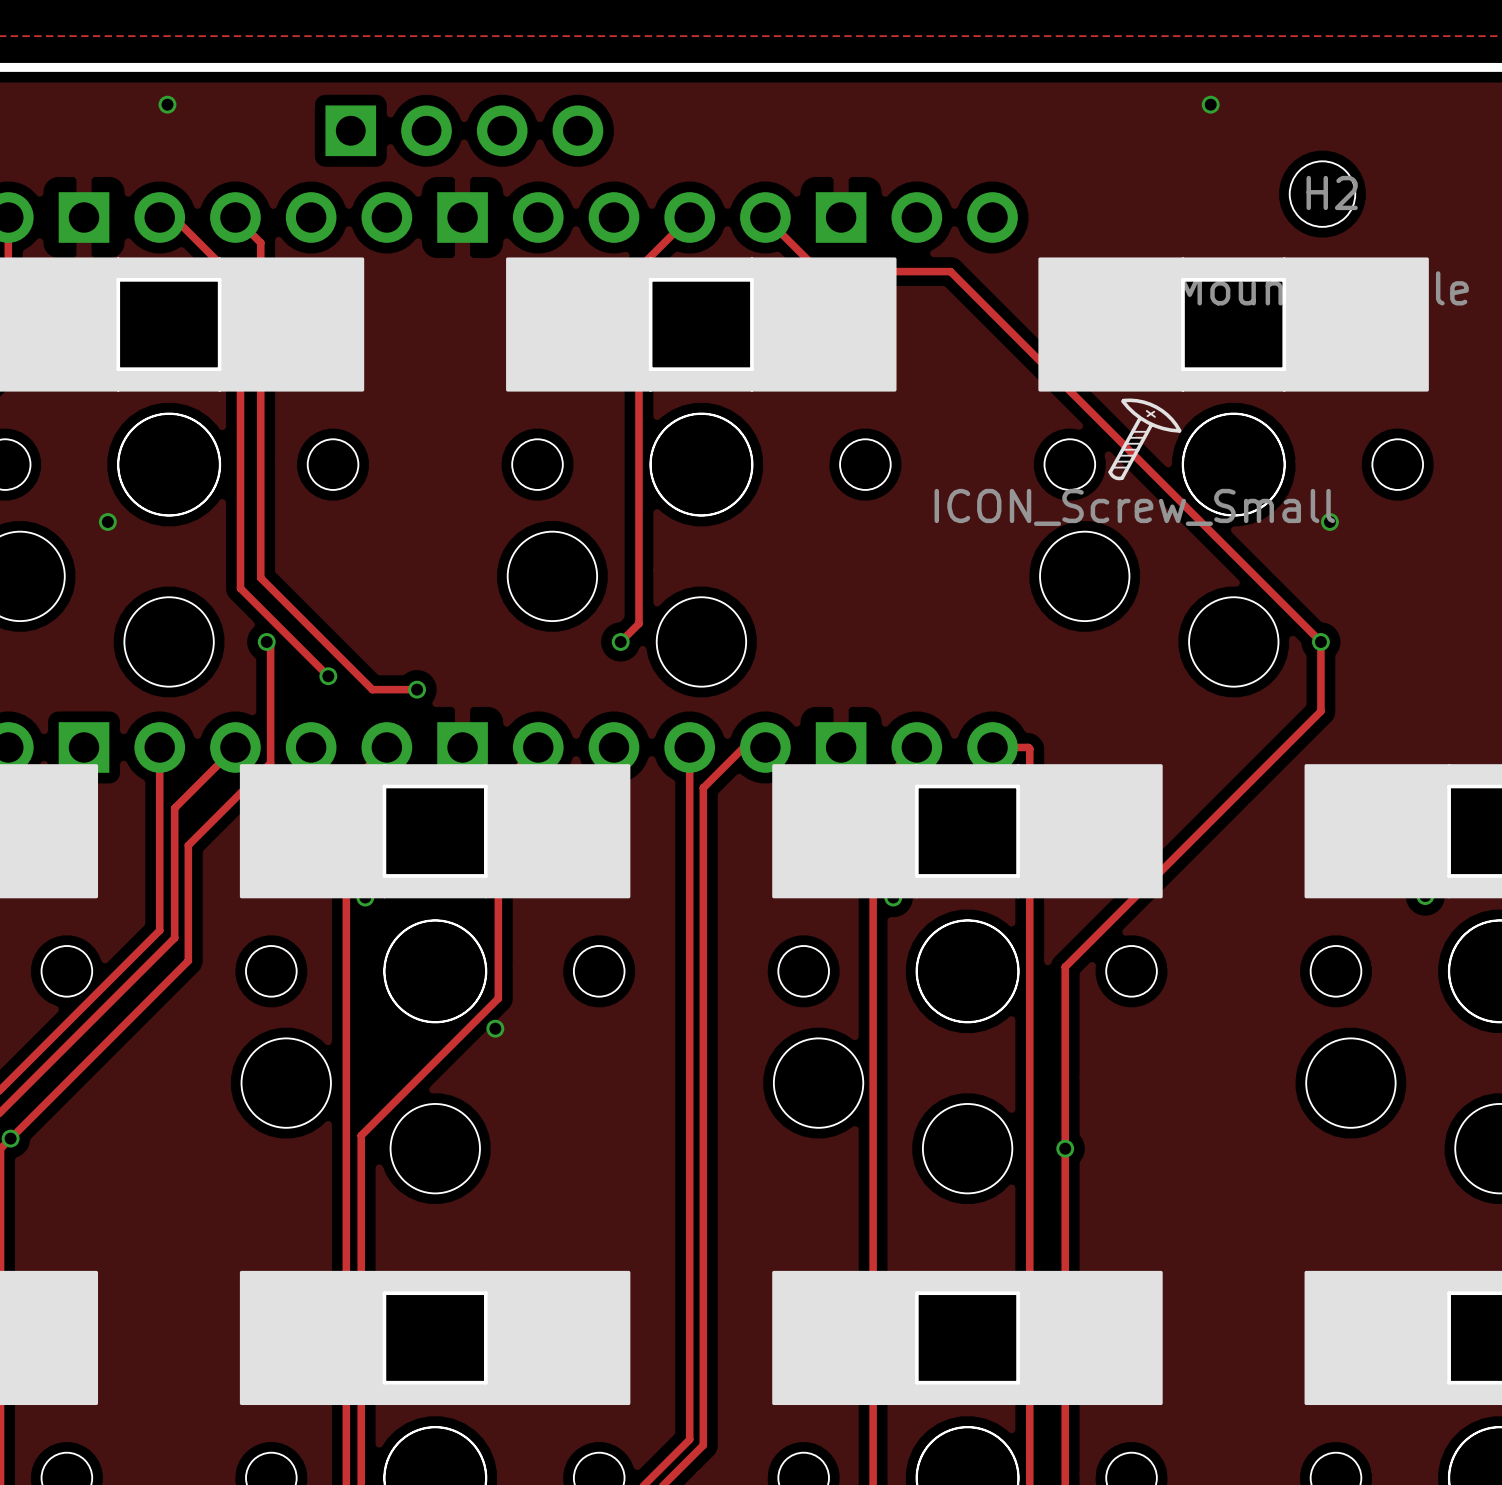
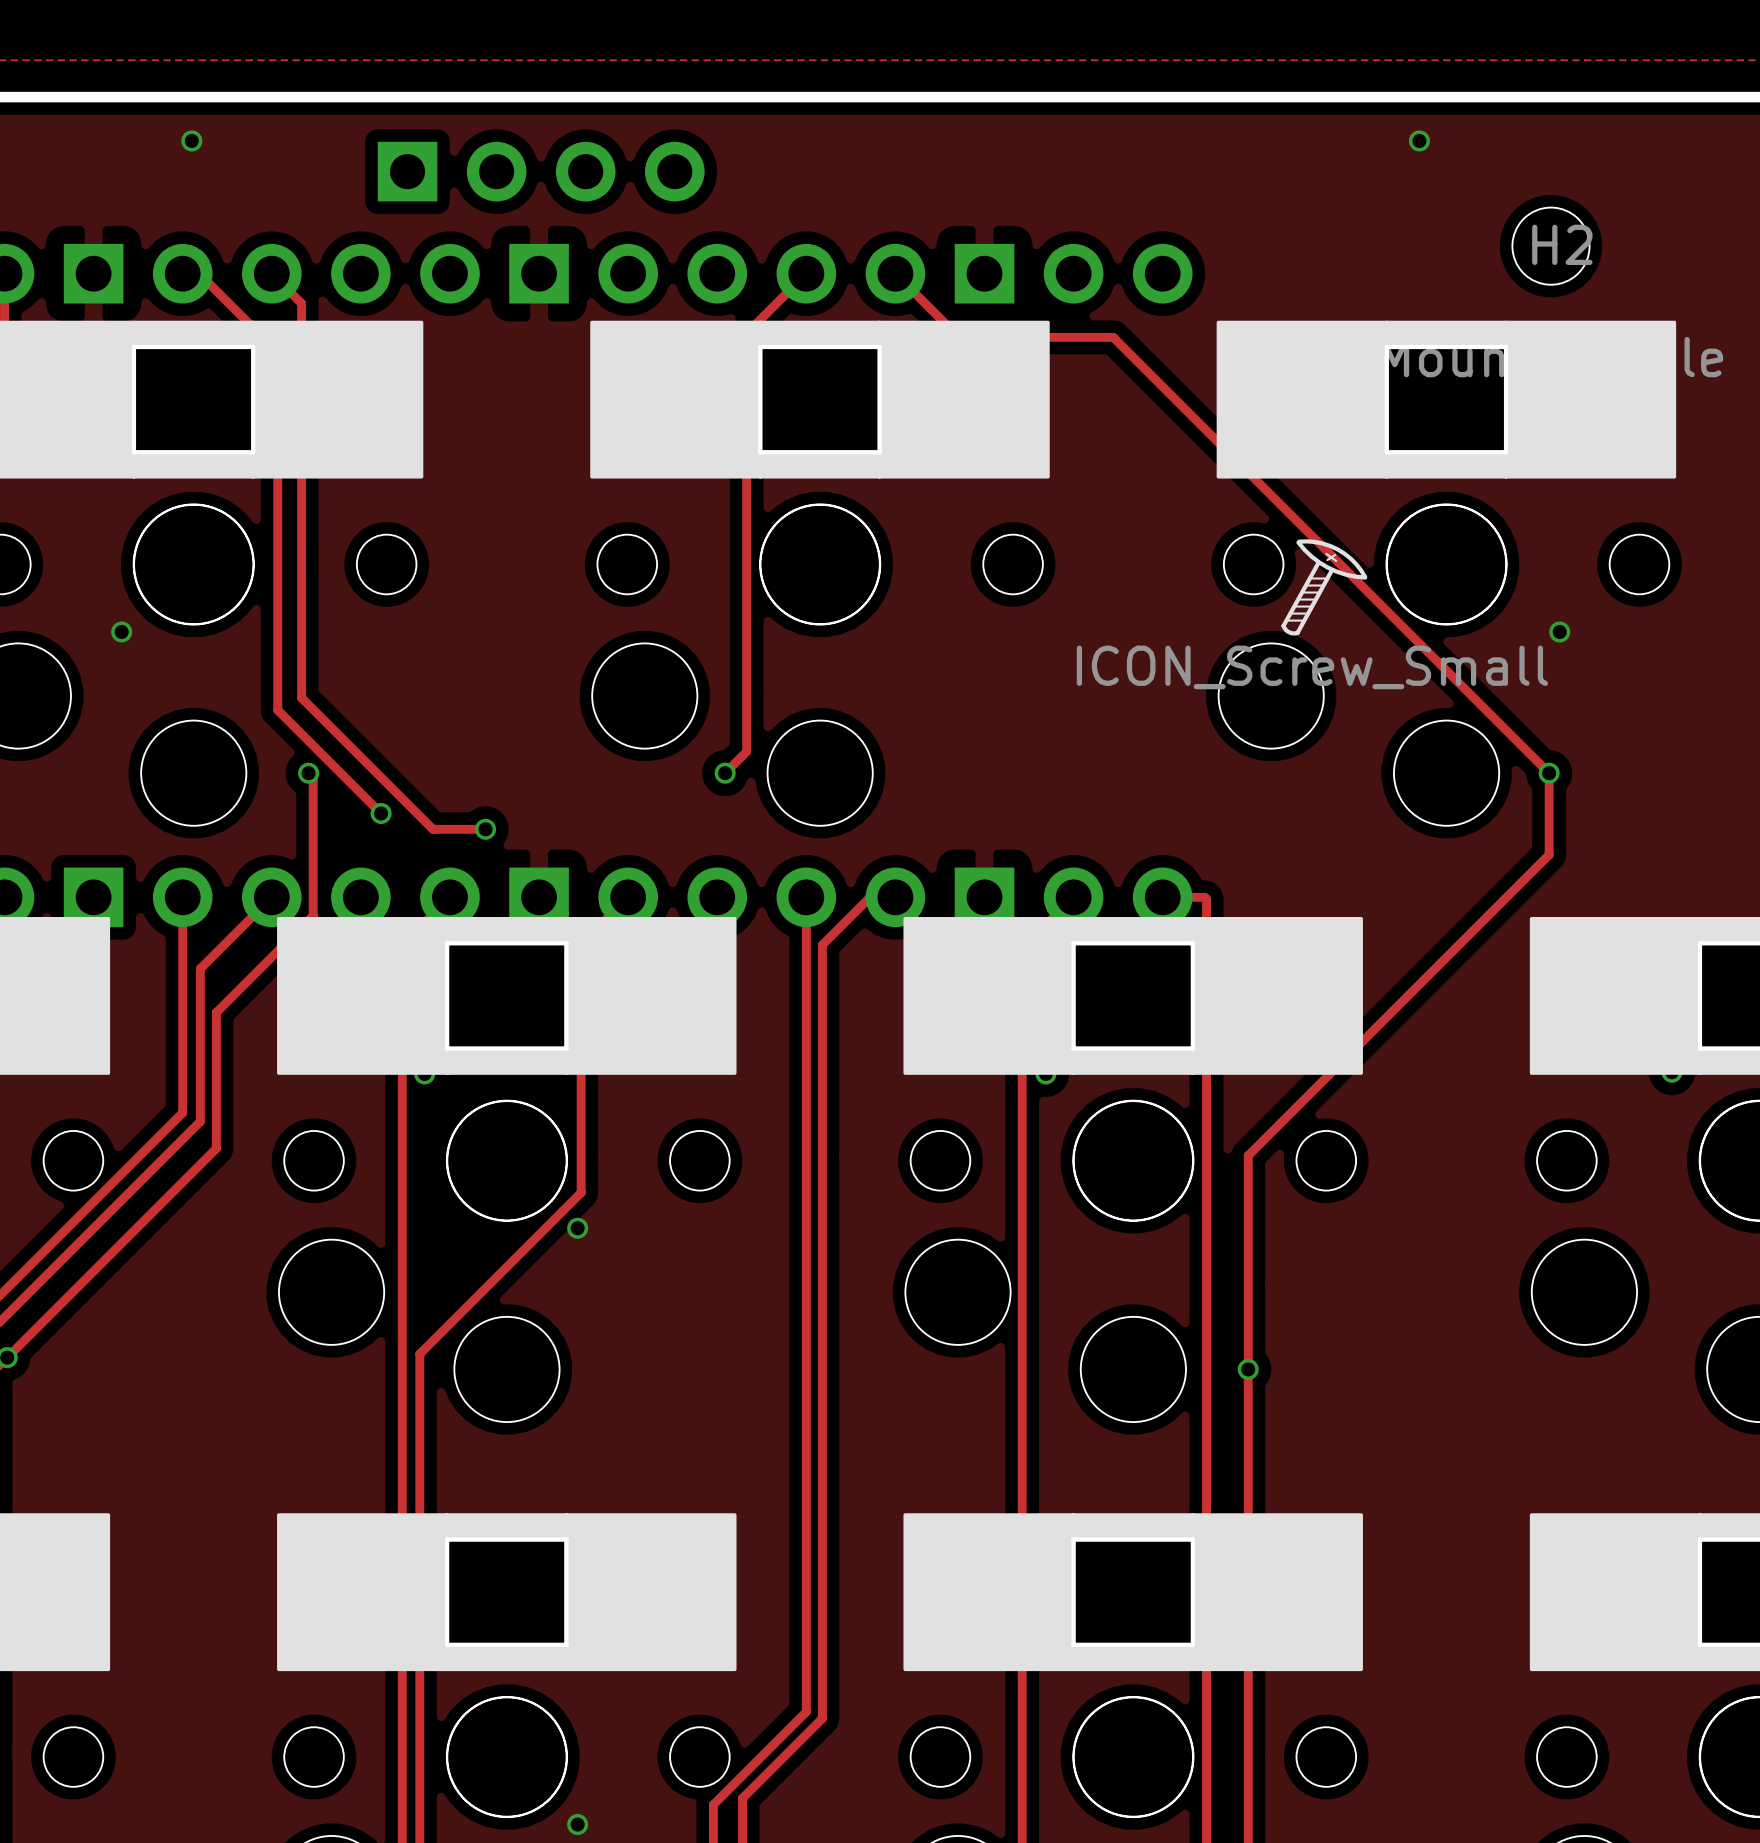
drawing position: (1144, 439) -> (1324, 587)

